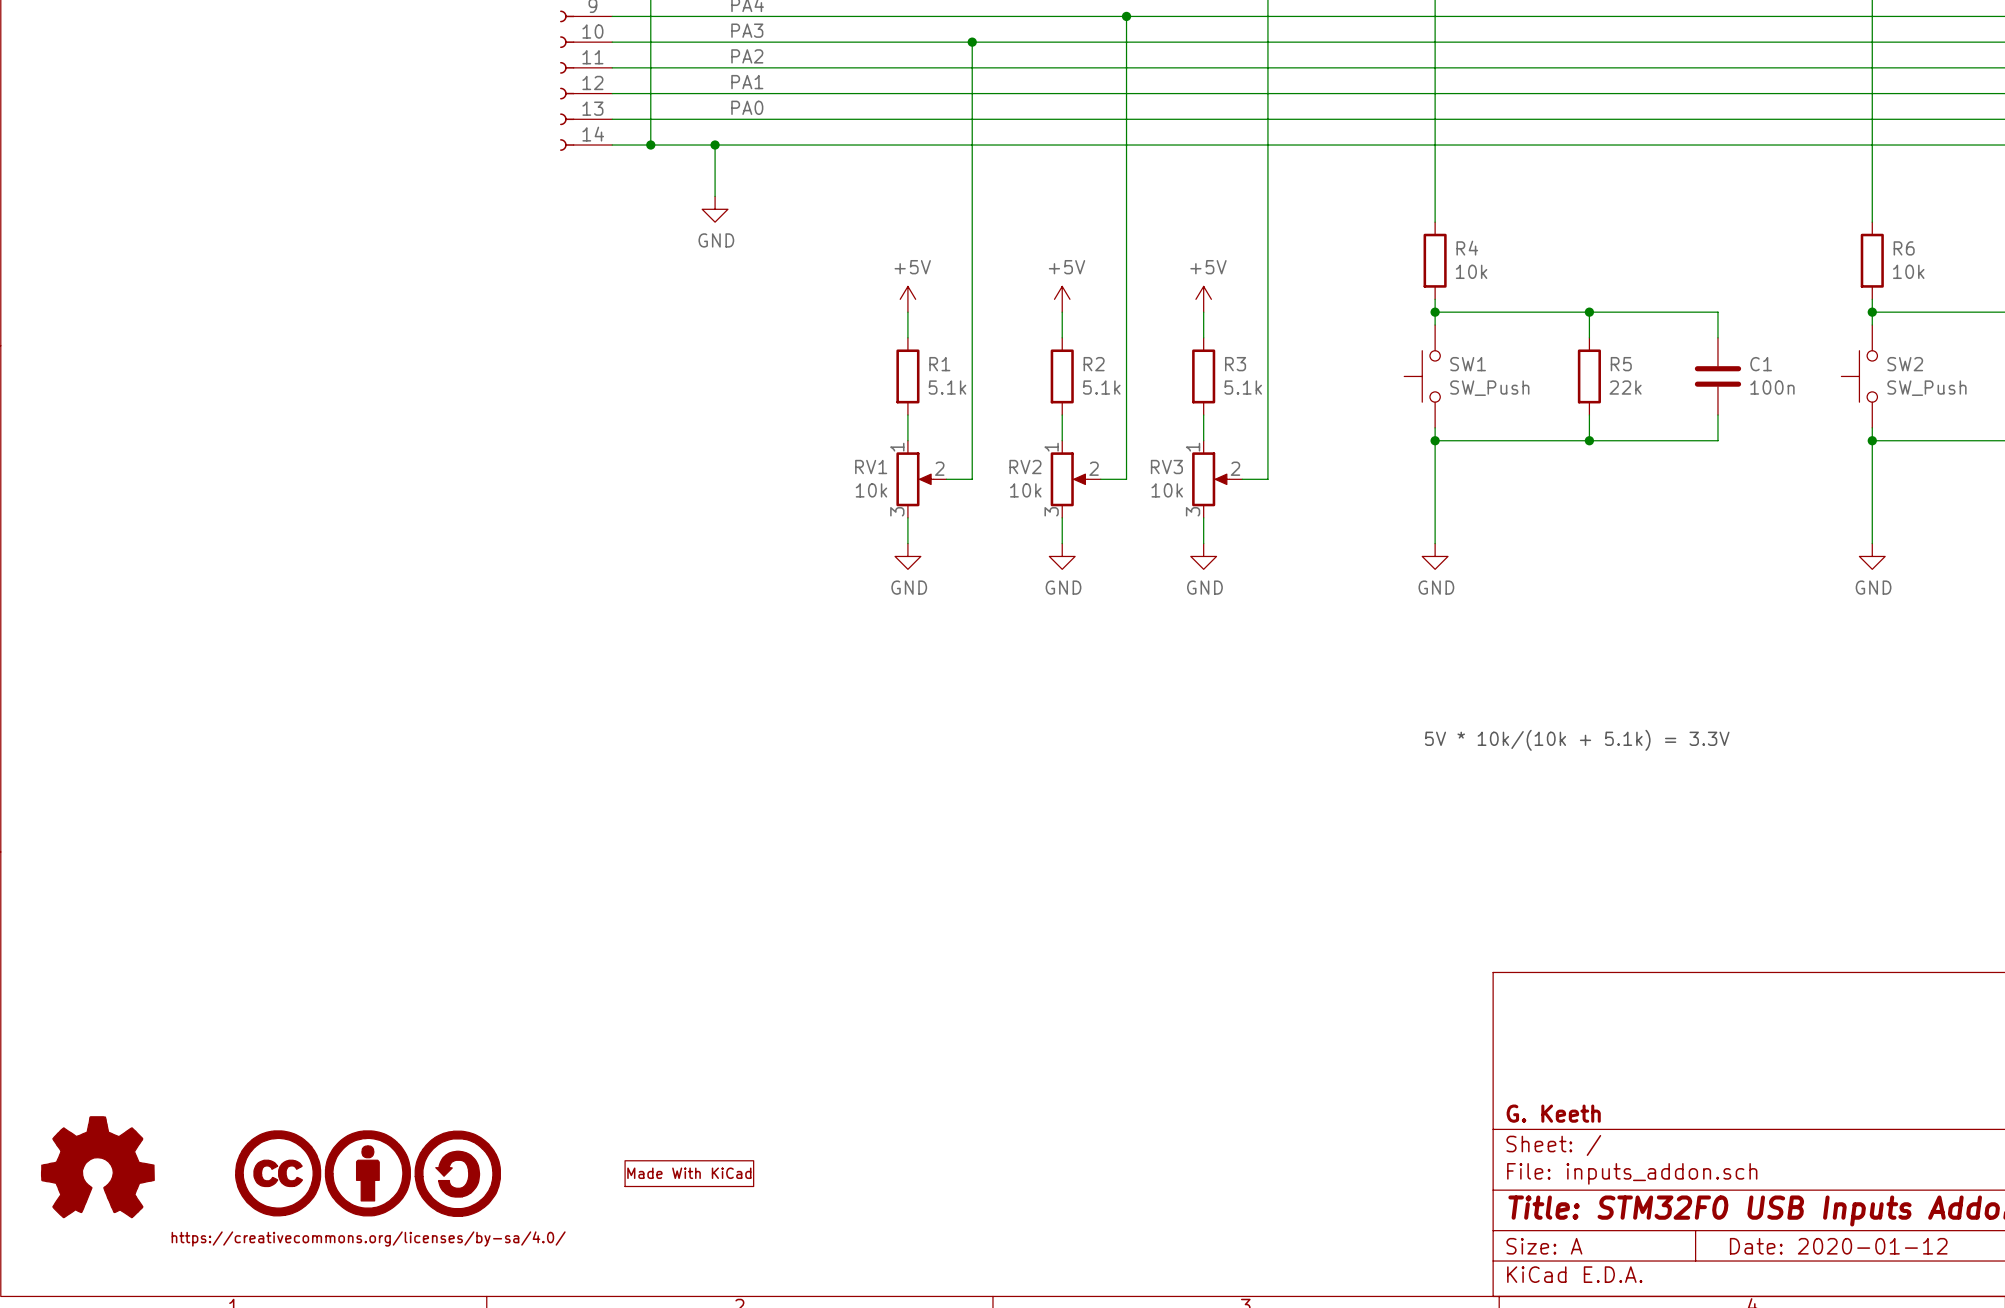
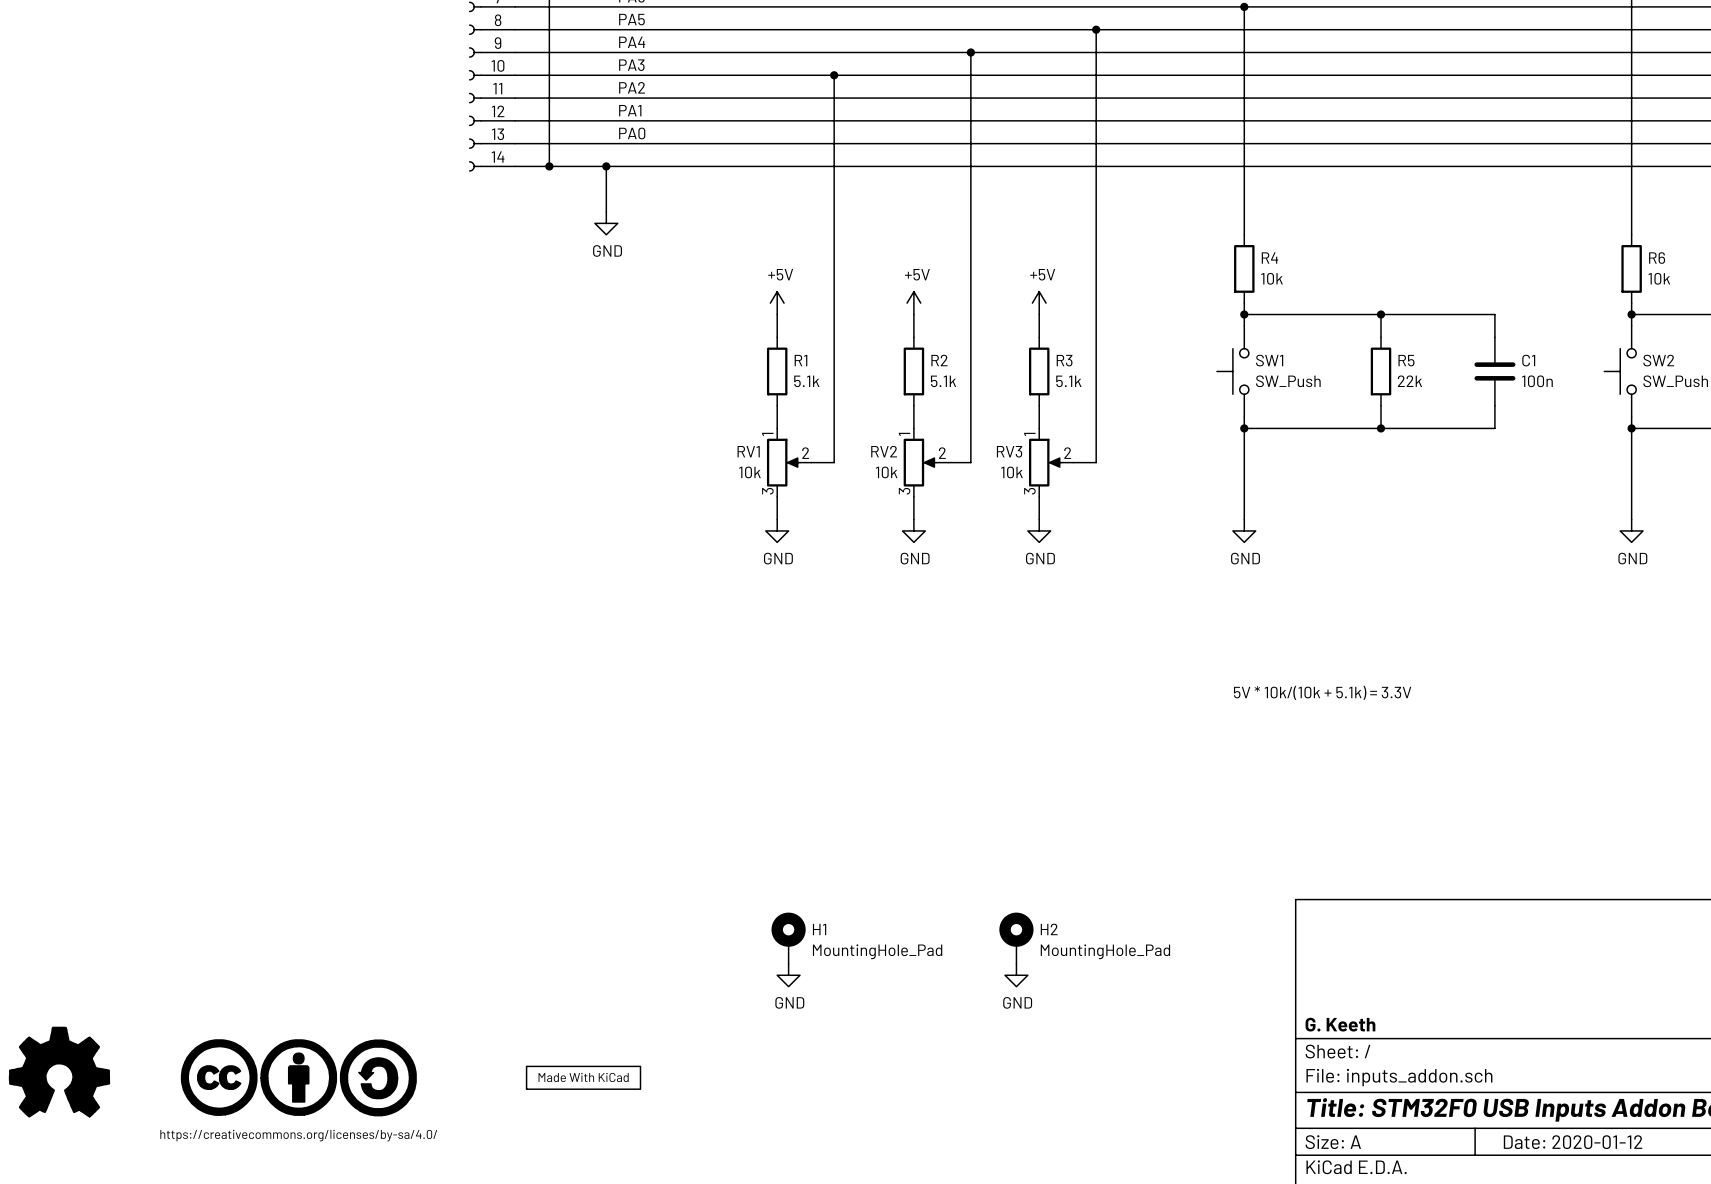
H1: none -> MountingHole_Pad (788, 938)
H2: none -> MountingHole_Pad (1016, 938)
power symbol: none -> GND (788, 975)
power symbol: none -> GND (1016, 975)

